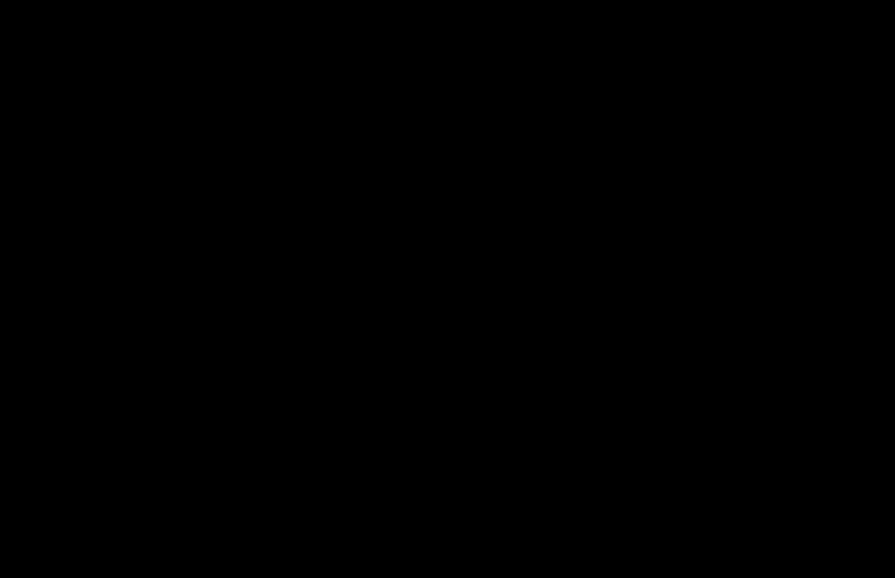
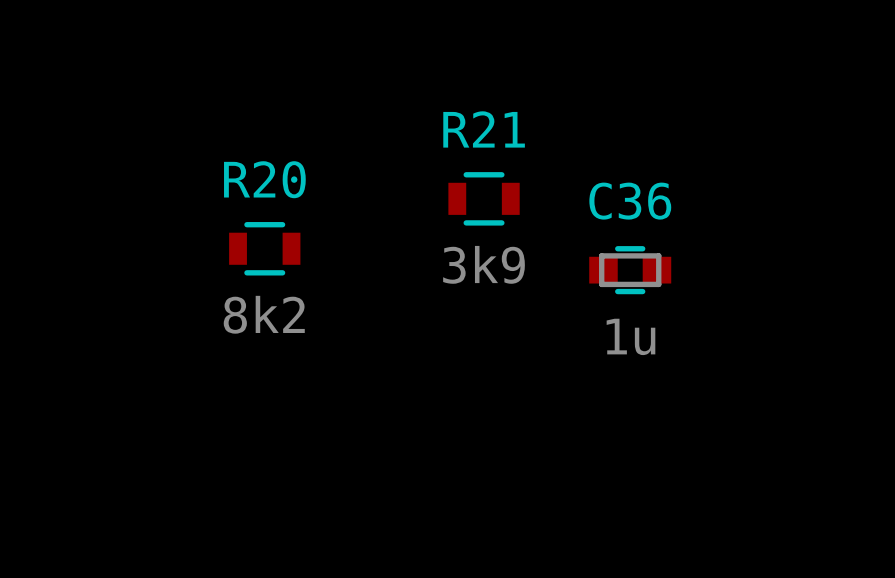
R21: none -> 3k9 (484, 198)
R20: none -> 8k2 (264, 248)
C36: none -> 1u (630, 270)

